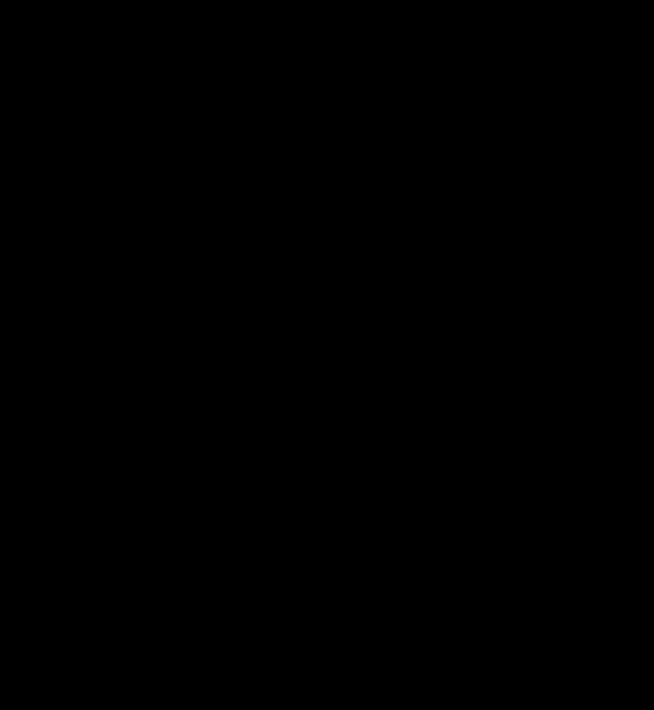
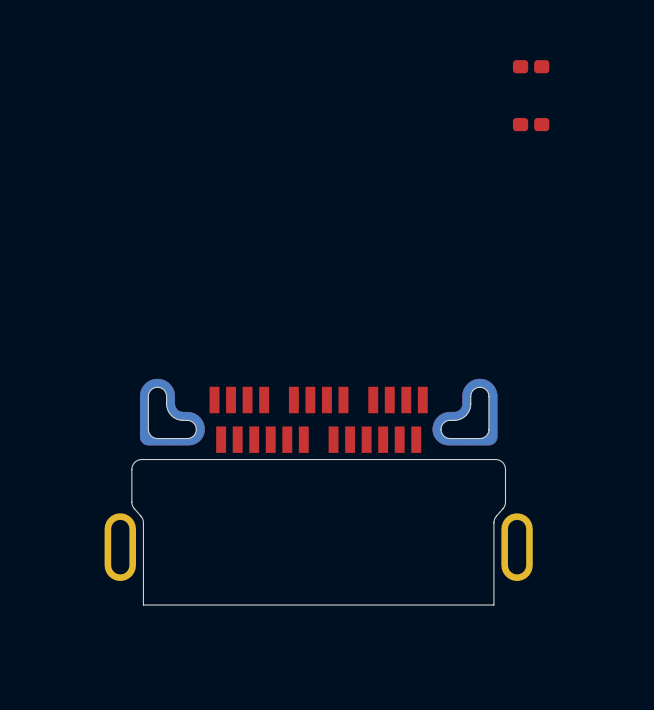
part: none -> (531, 66)
part: none -> (531, 124)
part: none -> (318, 492)

